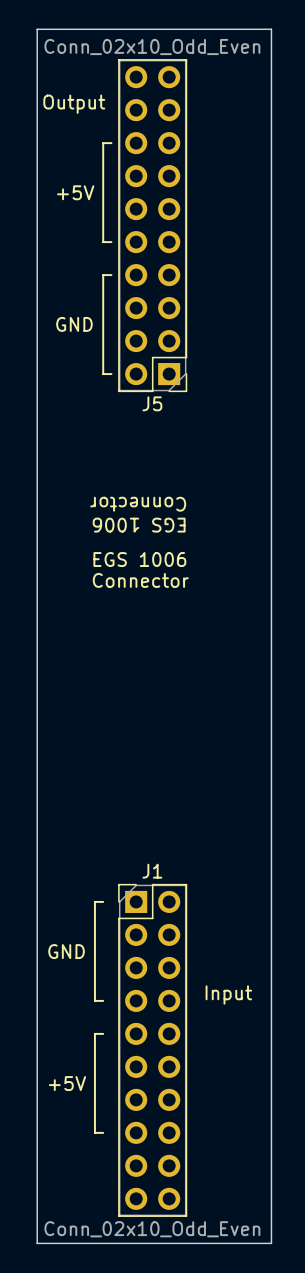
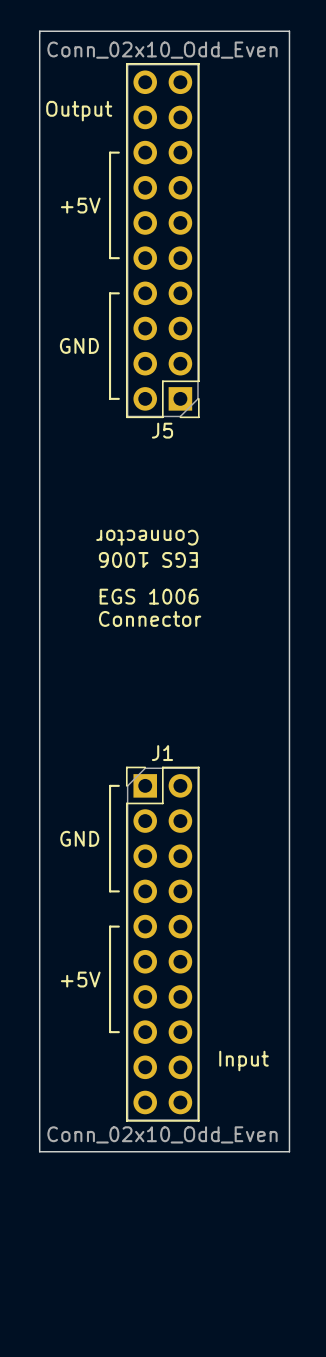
line: (103, 901) (94, 901) (94, 1000) (103, 1000) -> (118, 785) (110, 785) (110, 891) (118, 891)
text position: GND (66, 951) -> GND (79, 838)
line: (103, 1033) (94, 1033) (94, 1132) (103, 1132) -> (118, 926) (110, 926) (110, 1032) (118, 1032)
J1 position: (152, 1050) -> (162, 944)
board edge: (37, 1080) (37, 1243) (271, 1243) (271, 1080) -> (39, 1151) (289, 1151)
text position: +5V (67, 1083) -> +5V (80, 979)

